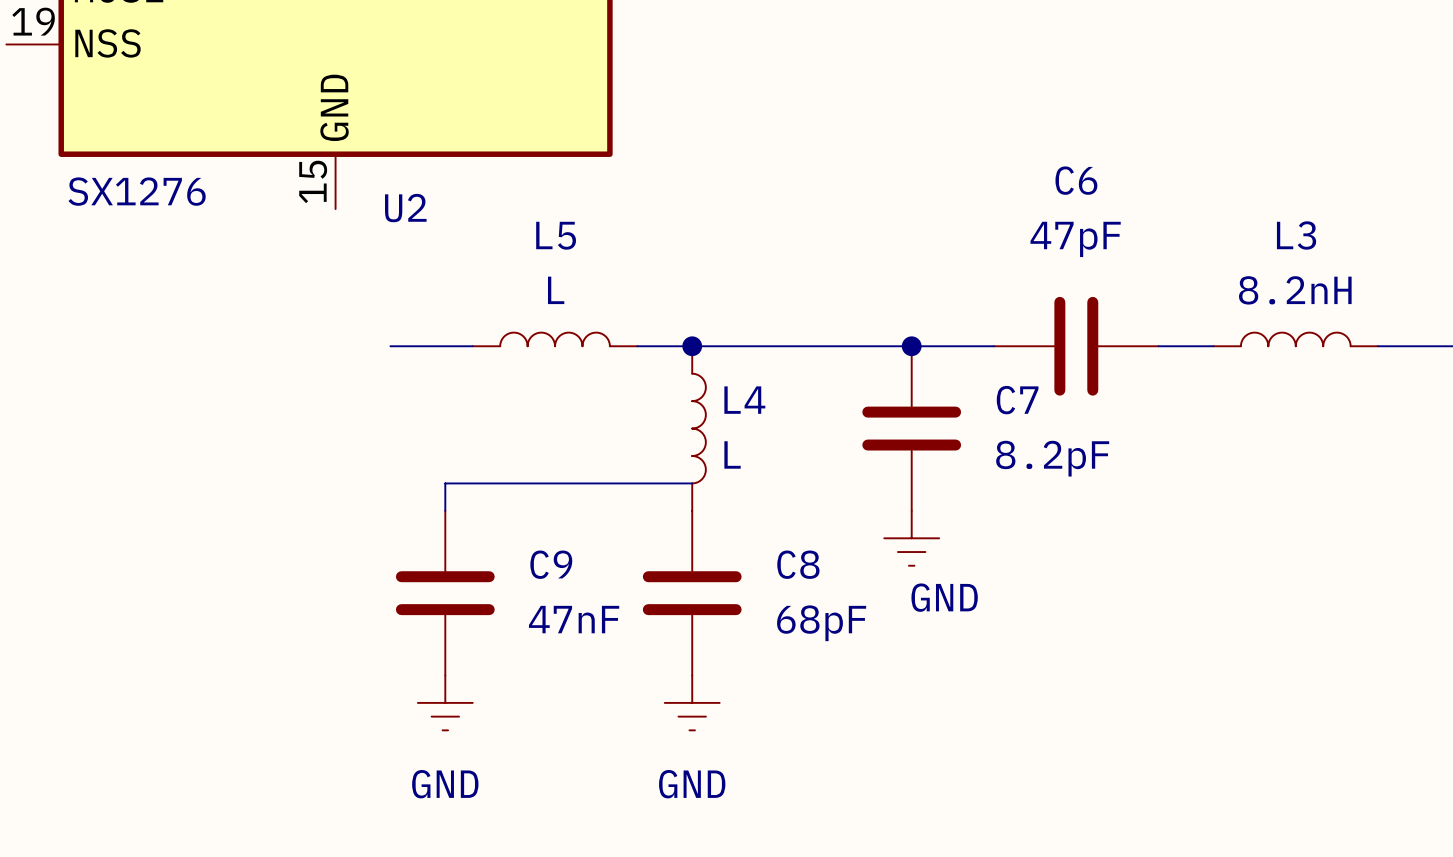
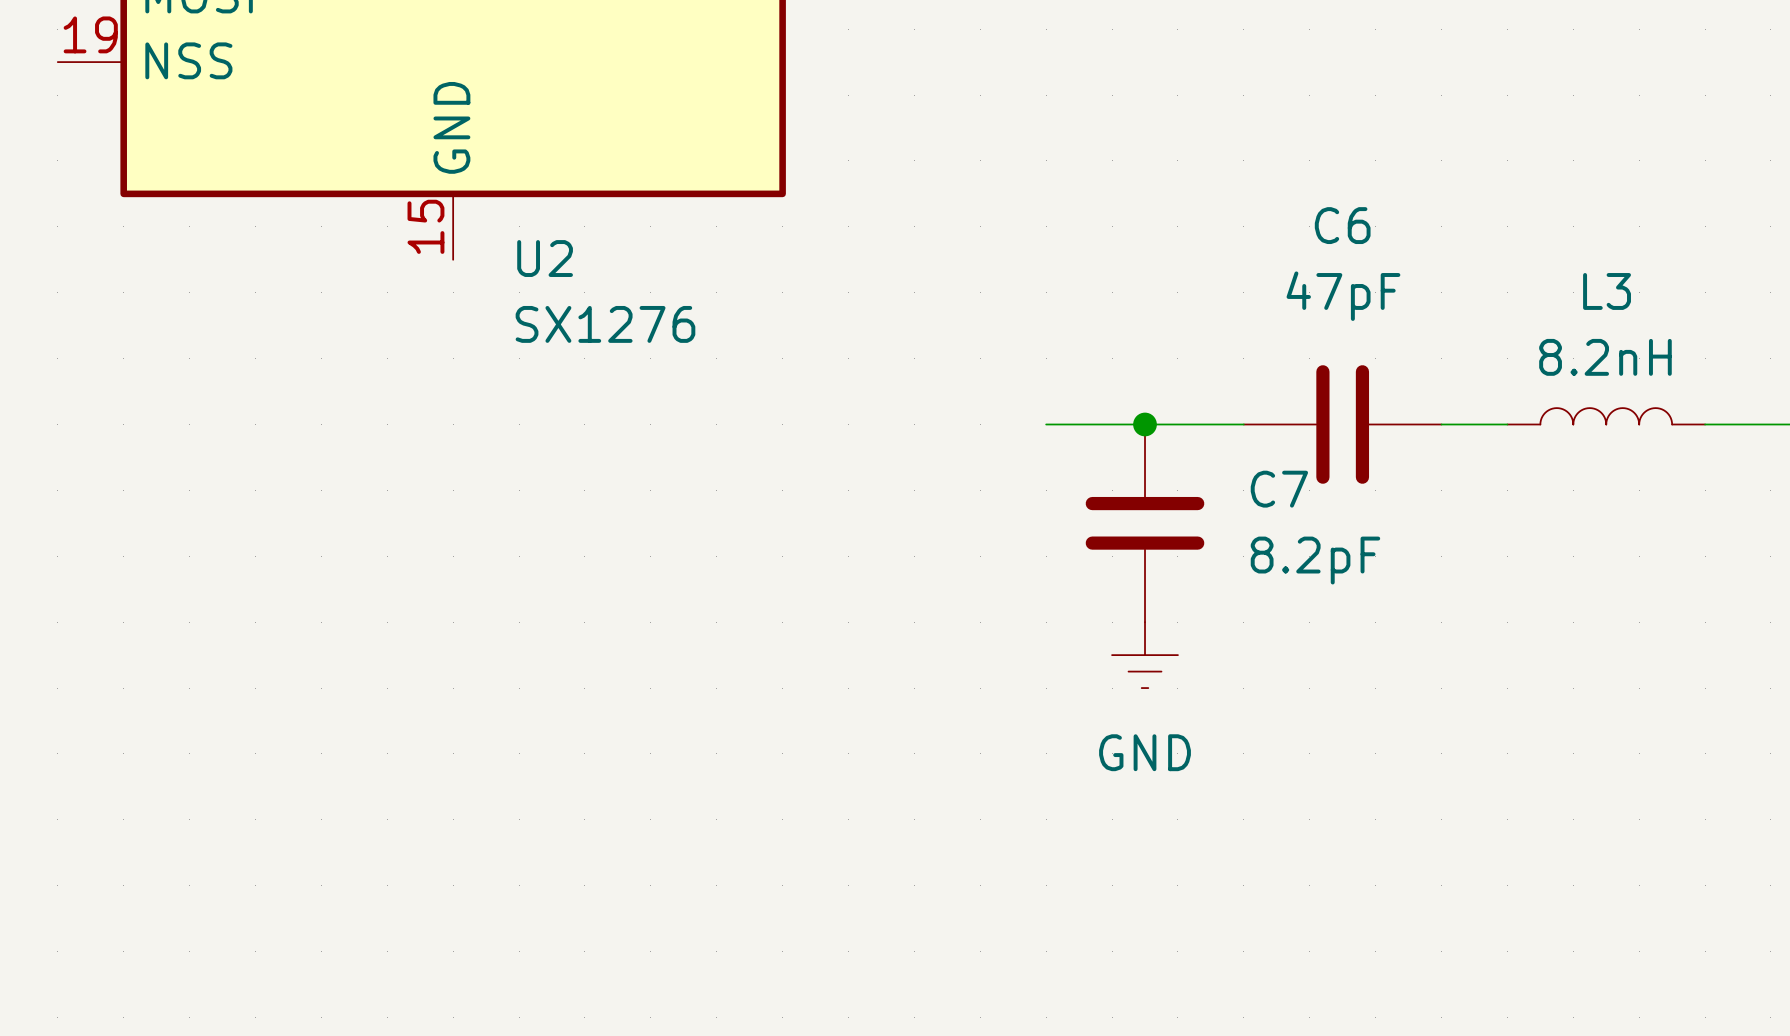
U2 value position: SX1276 (137, 191) -> SX1276 (605, 324)
L5: L (555, 339) -> none
wire: (390, 346) (472, 346) -> none
wire: (637, 346) (829, 346) -> none
junction: (692, 346) -> none
L4: L (699, 428) -> none
wire: (692, 483) (445, 483) (445, 510) -> none
C9: 47nF (445, 593) -> none
C8: 68pF (692, 593) -> none
power symbol text position: GND (944, 597) -> GND (1145, 752)
power symbol: GND (445, 702) -> none
power symbol: GND (692, 702) -> none

